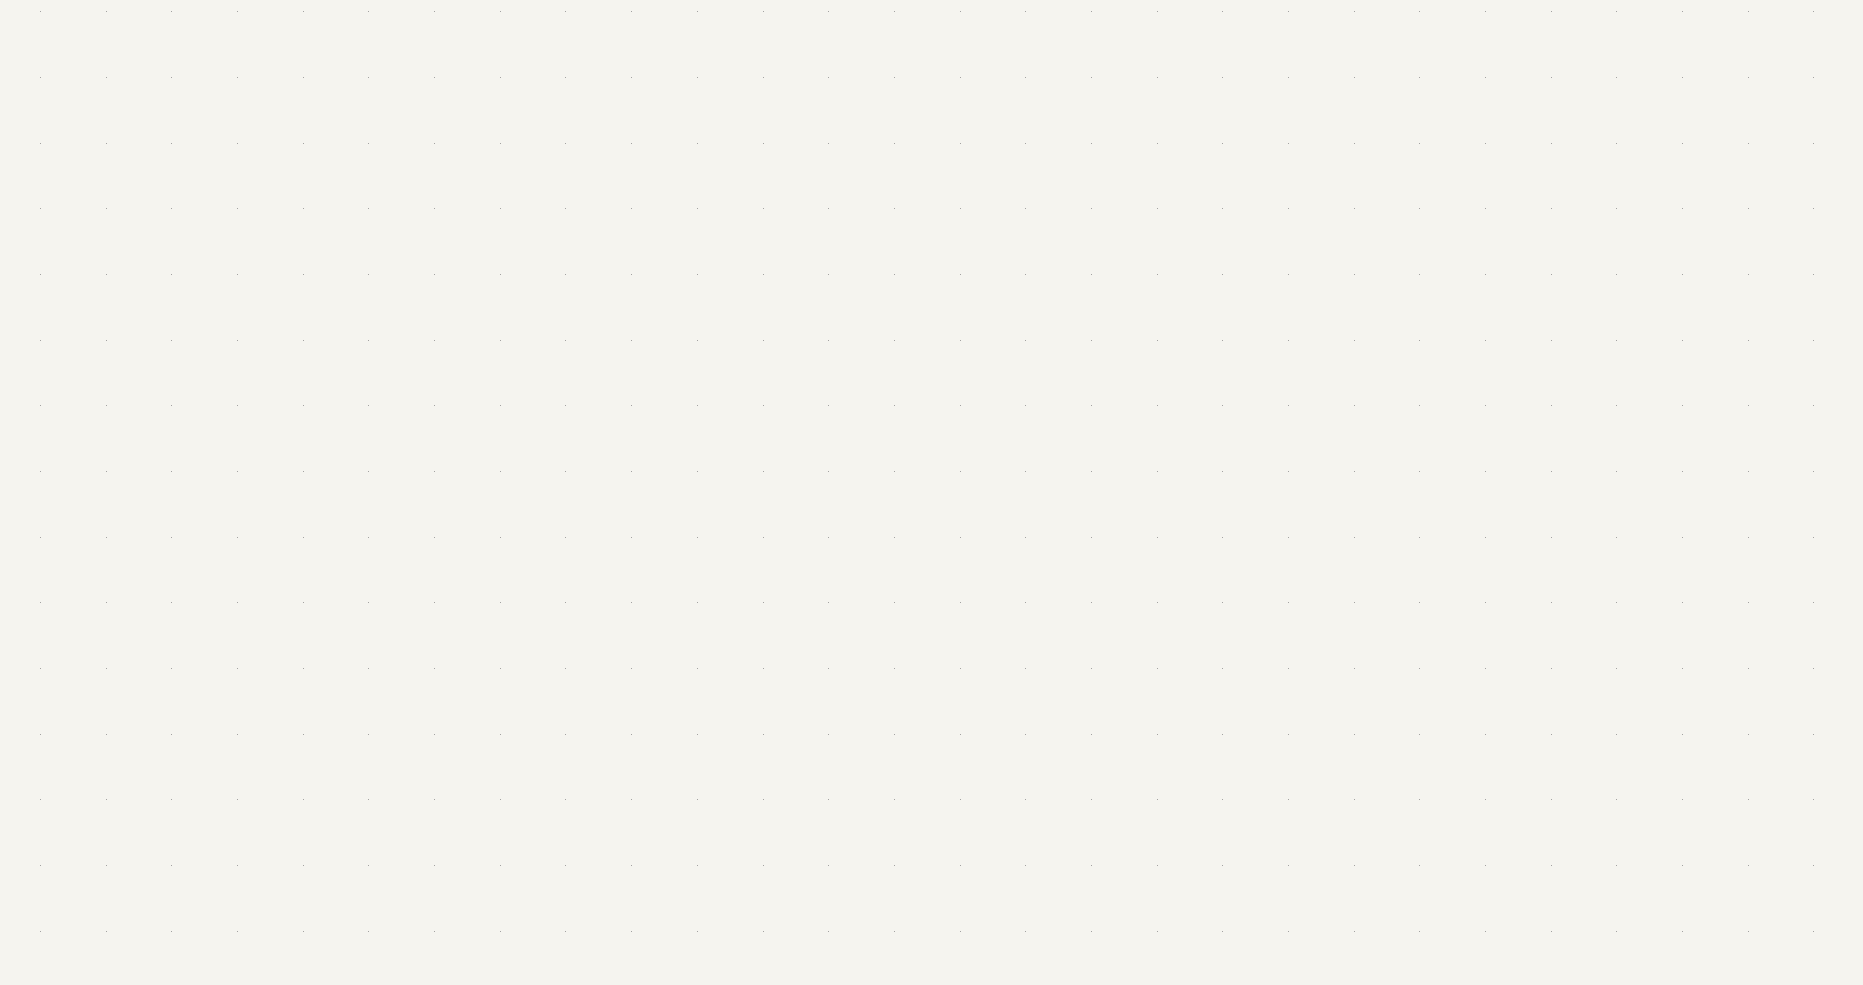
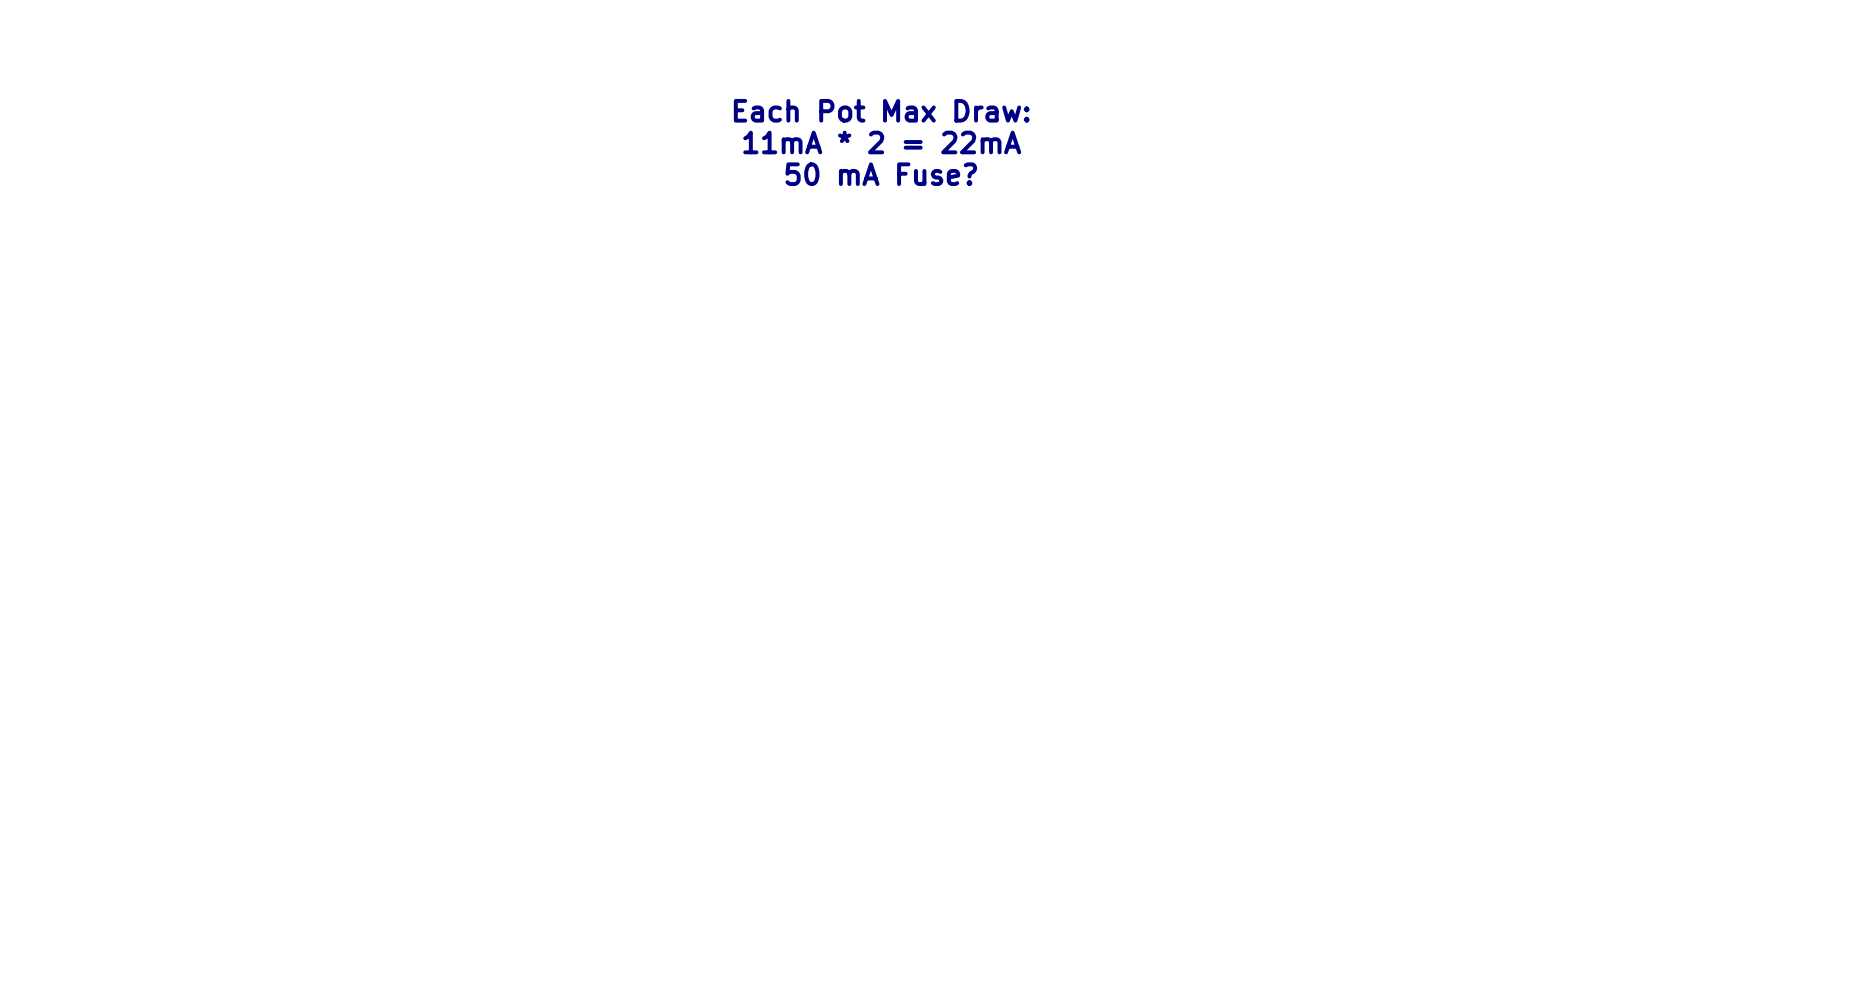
text: none -> Each Pot Max Draw: (881, 110)
text: none -> 11mA * 2 = 22mA (882, 142)
text: none -> 50 mA Fuse? (881, 174)

